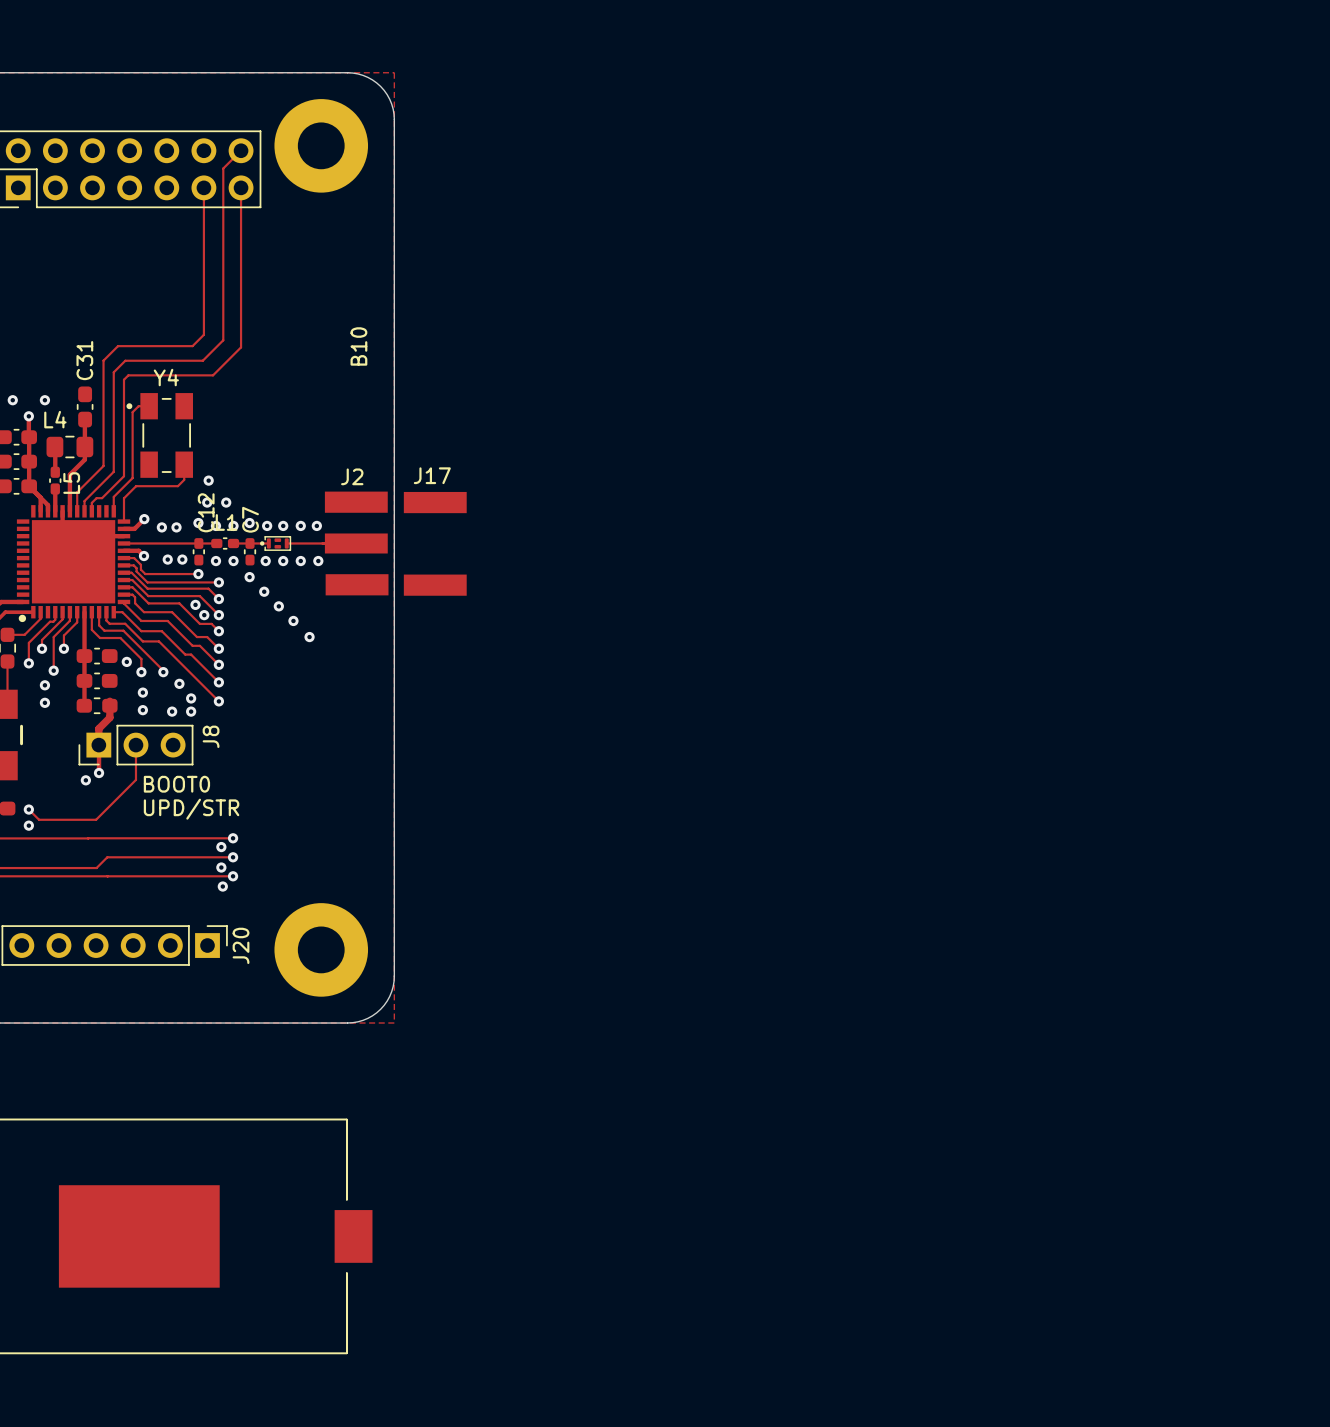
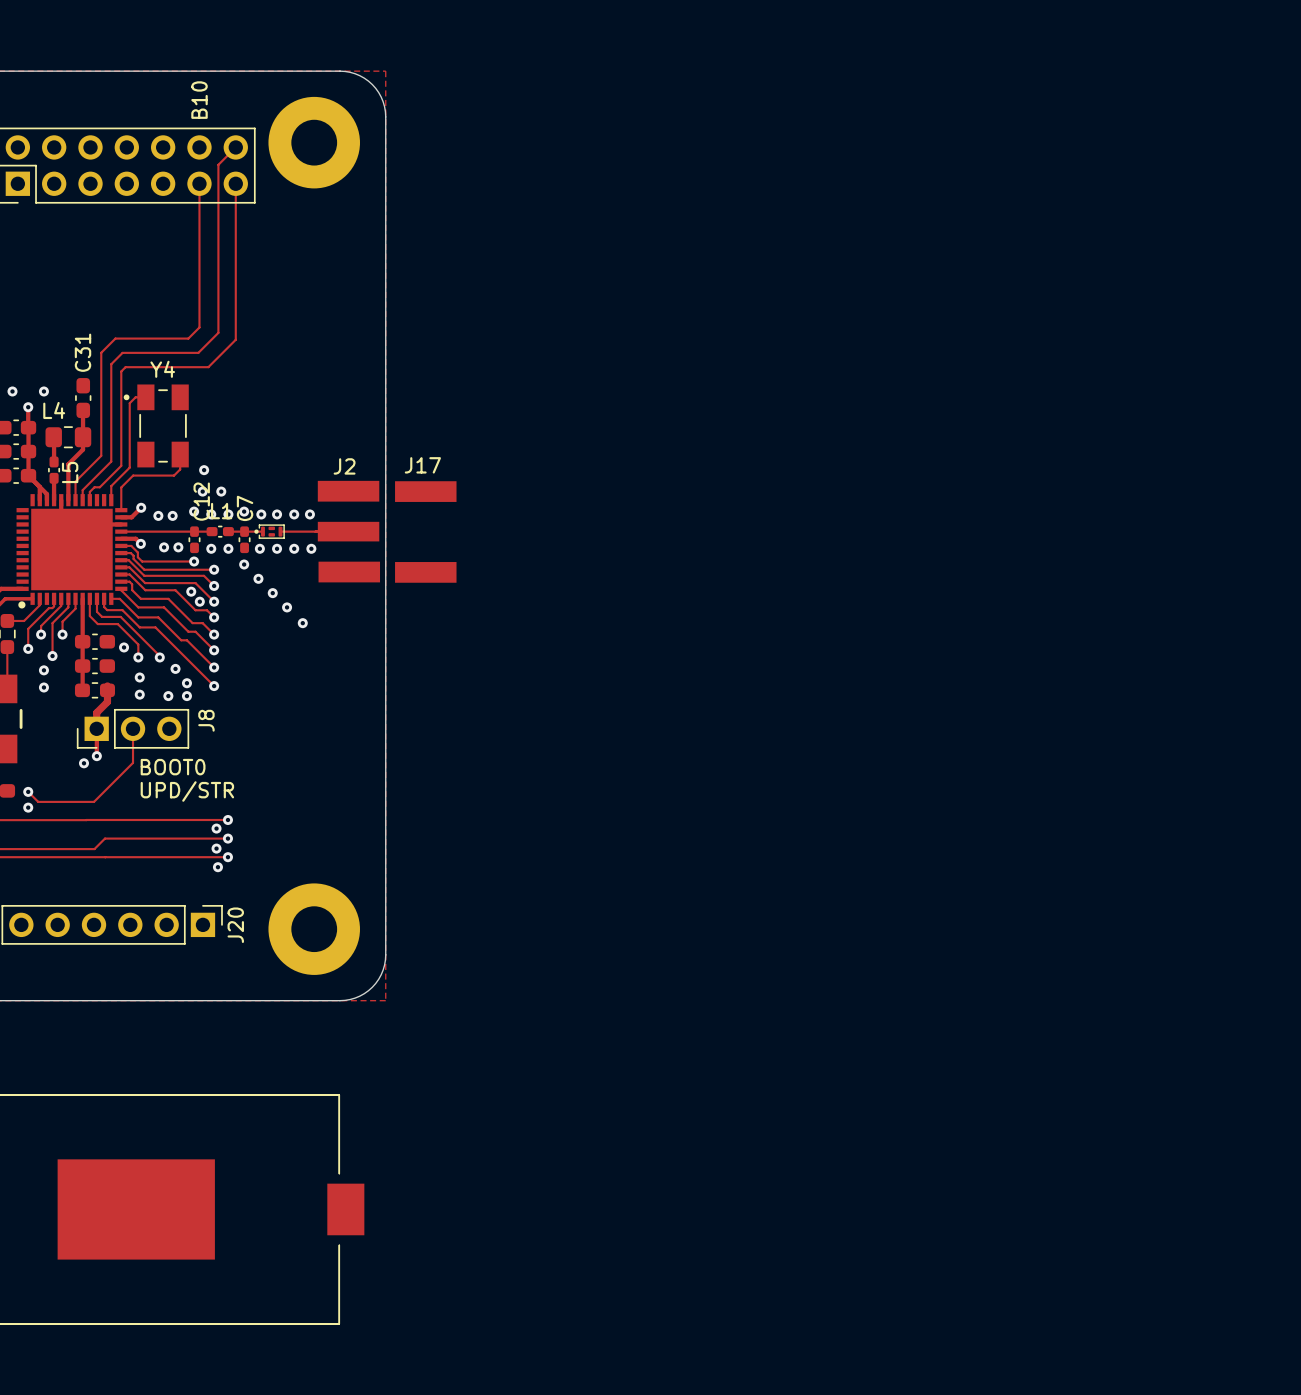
text position: B10 (358, 346) -> B10 (199, 100)

